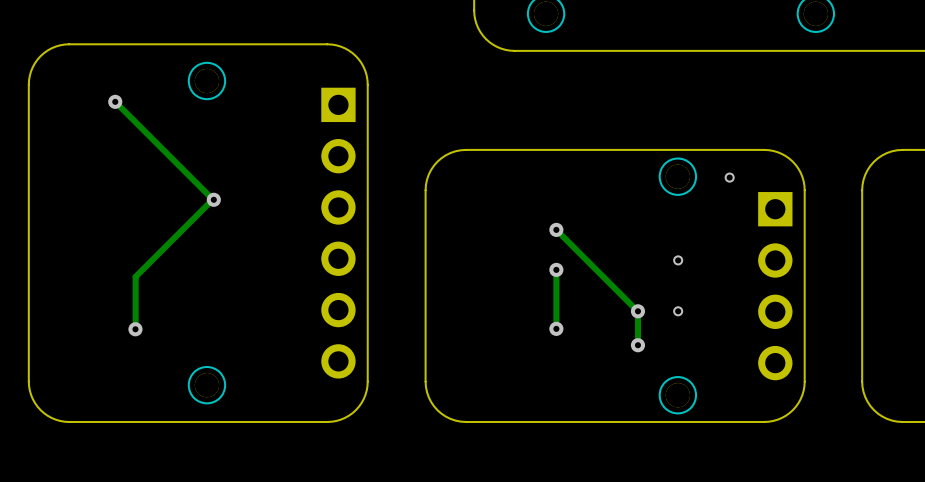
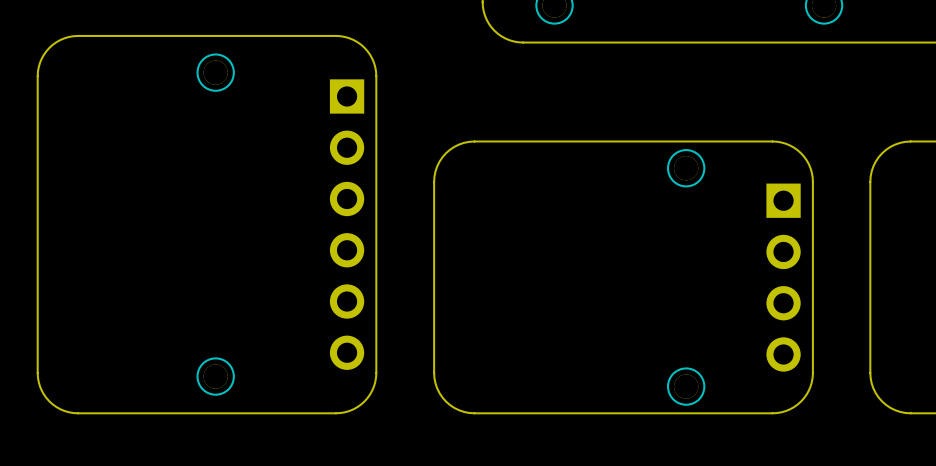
track: (115, 101) (213, 199) -> none
via: (115, 101) -> none
via: (729, 177) -> none
track: (213, 199) (135, 276) (135, 330) -> none
via: (213, 199) -> none
track: (556, 229) (637, 311) -> none
via: (556, 229) -> none
via: (678, 260) -> none
track: (556, 269) (556, 328) -> none
via: (556, 269) -> none
track: (637, 311) (637, 345) -> none
via: (637, 311) -> none
via: (678, 311) -> none
via: (556, 328) -> none
via: (135, 329) -> none
via: (637, 345) -> none

